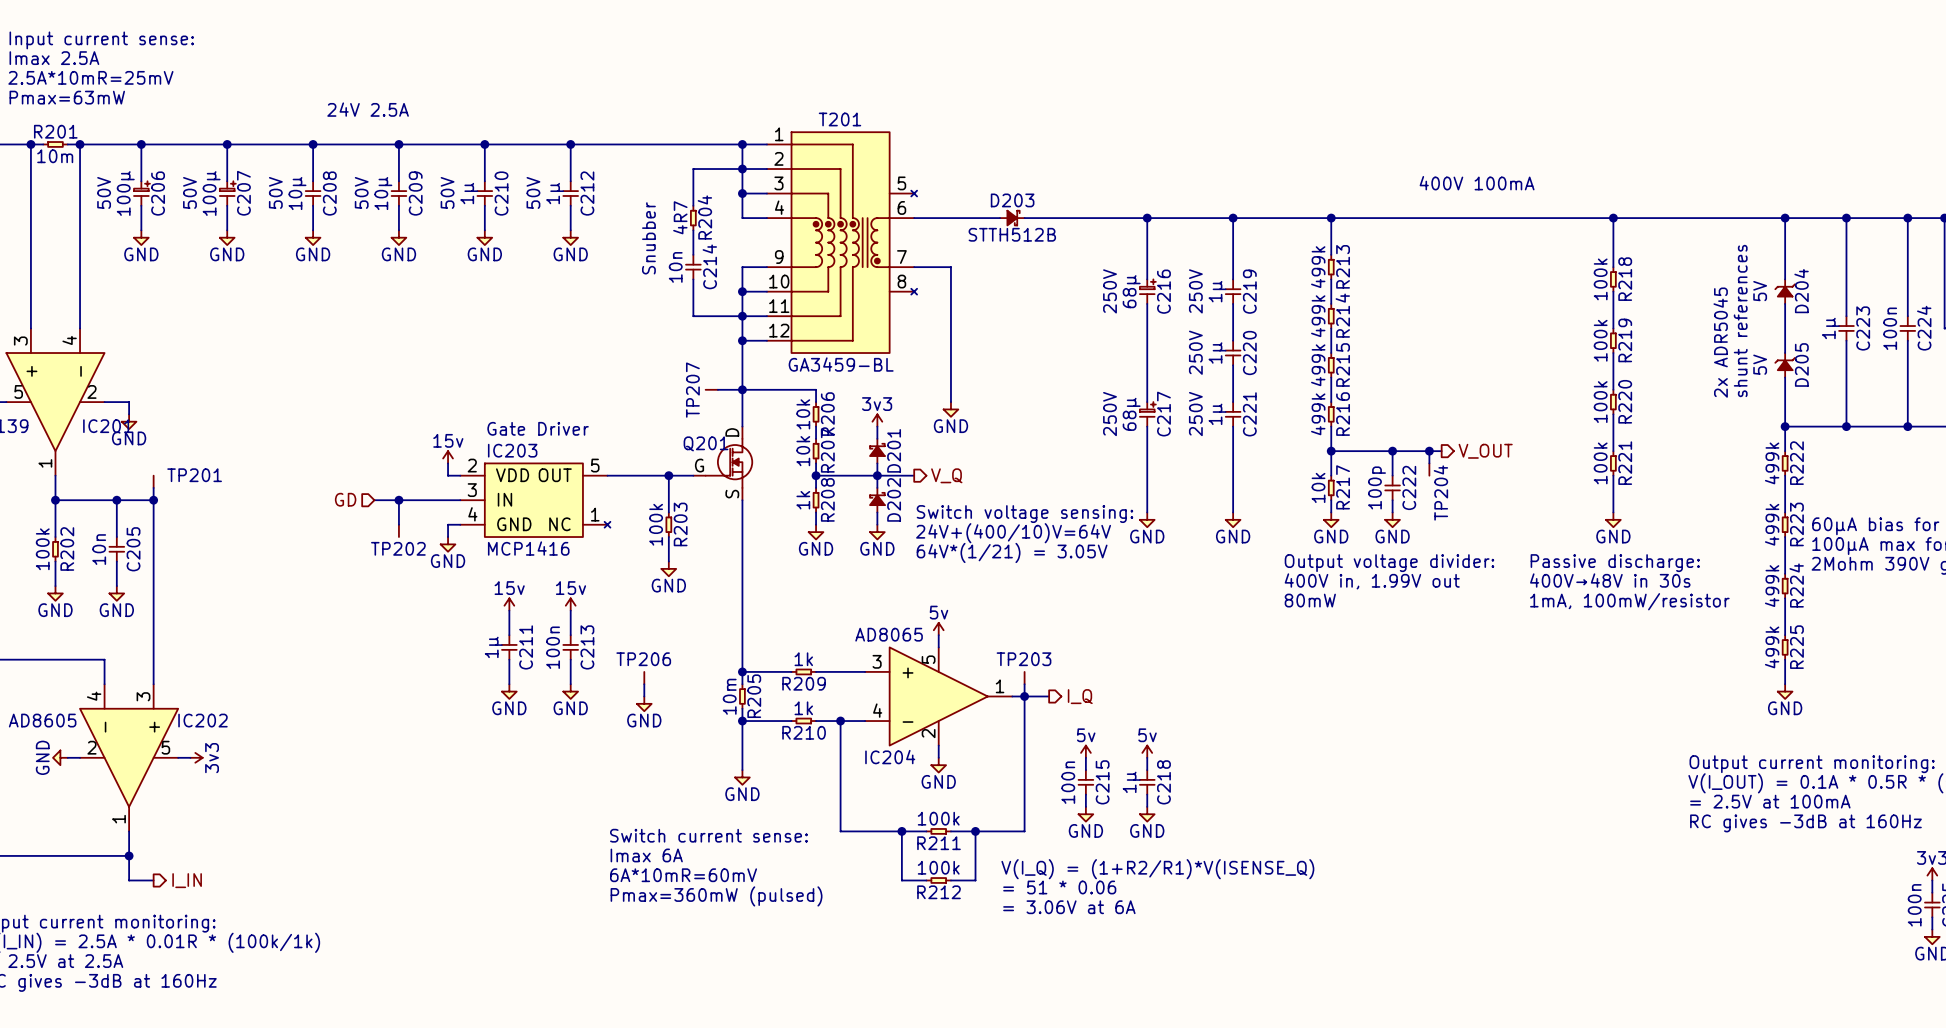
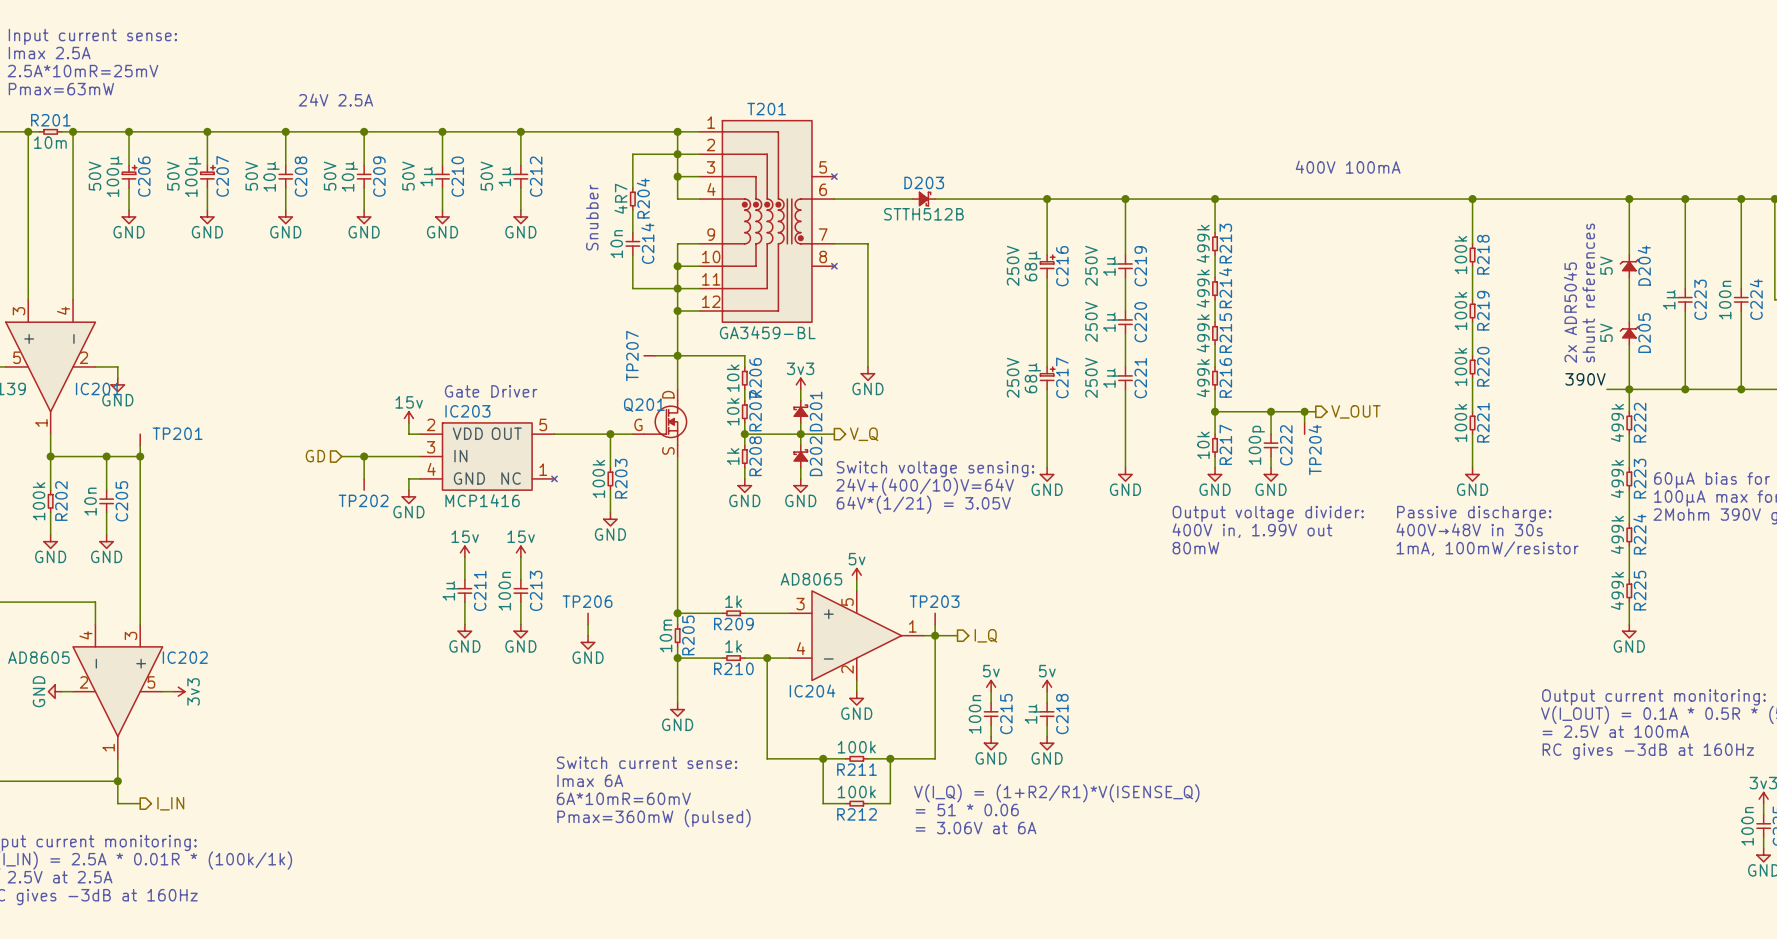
label: none -> 390V (1585, 379)
wire: none -> (1606, 389) (1629, 389)

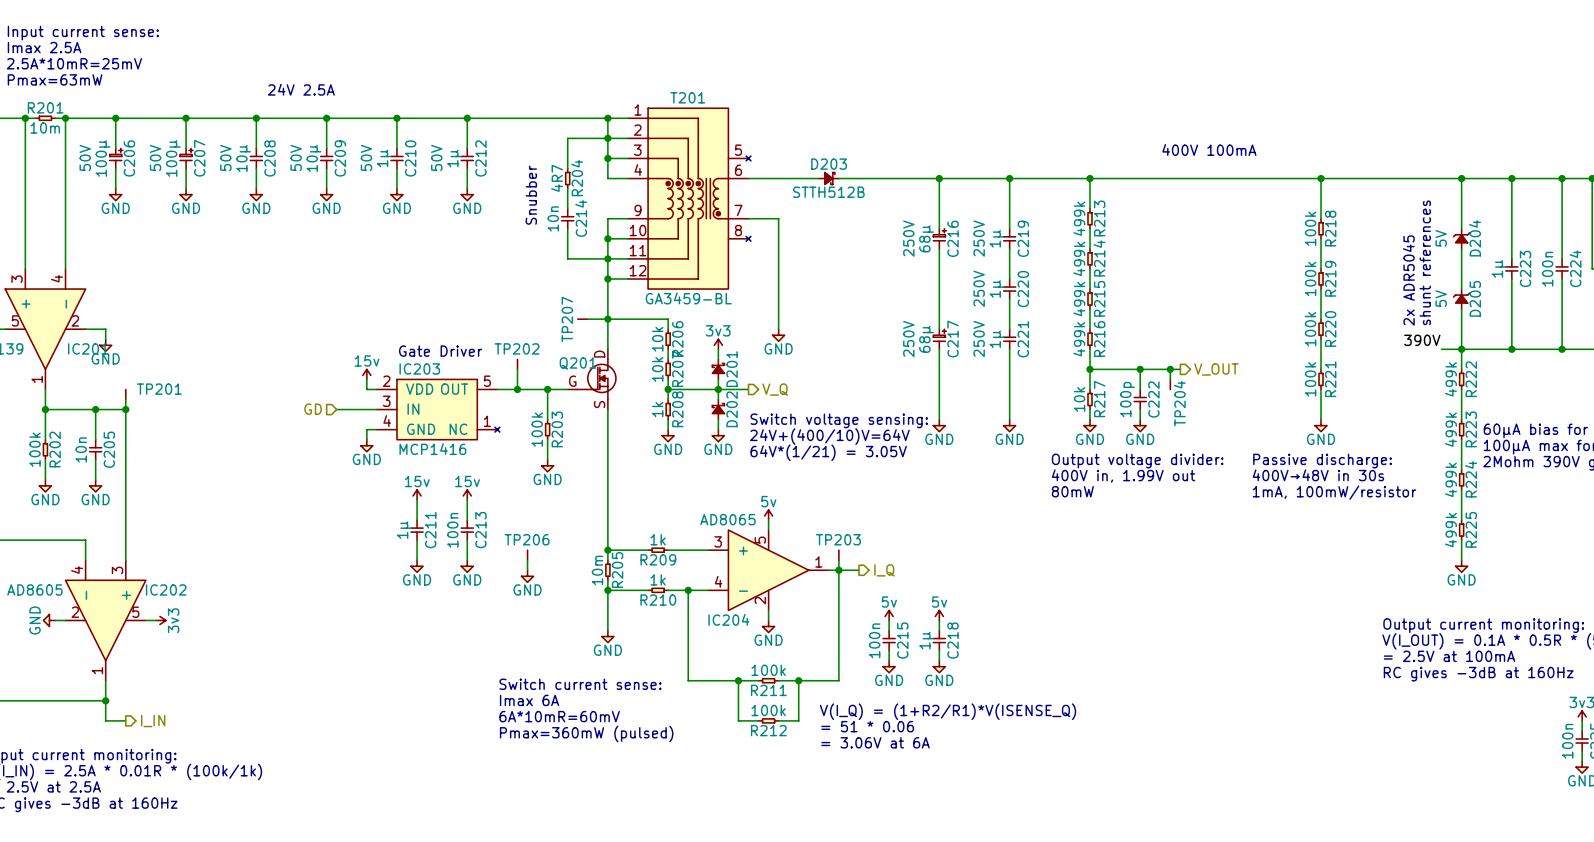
junction: none -> (517, 389)
hierarchical label position: GD (315, 456) -> GD (313, 409)
wire: (341, 456) (375, 456) -> none
wire: (364, 456) (364, 478) -> (517, 369) (517, 389)
junction: (364, 456) -> none
TP202 position: (364, 487) -> (517, 362)
TP202 rotation: 0° (364, 490) -> 180° (517, 359)

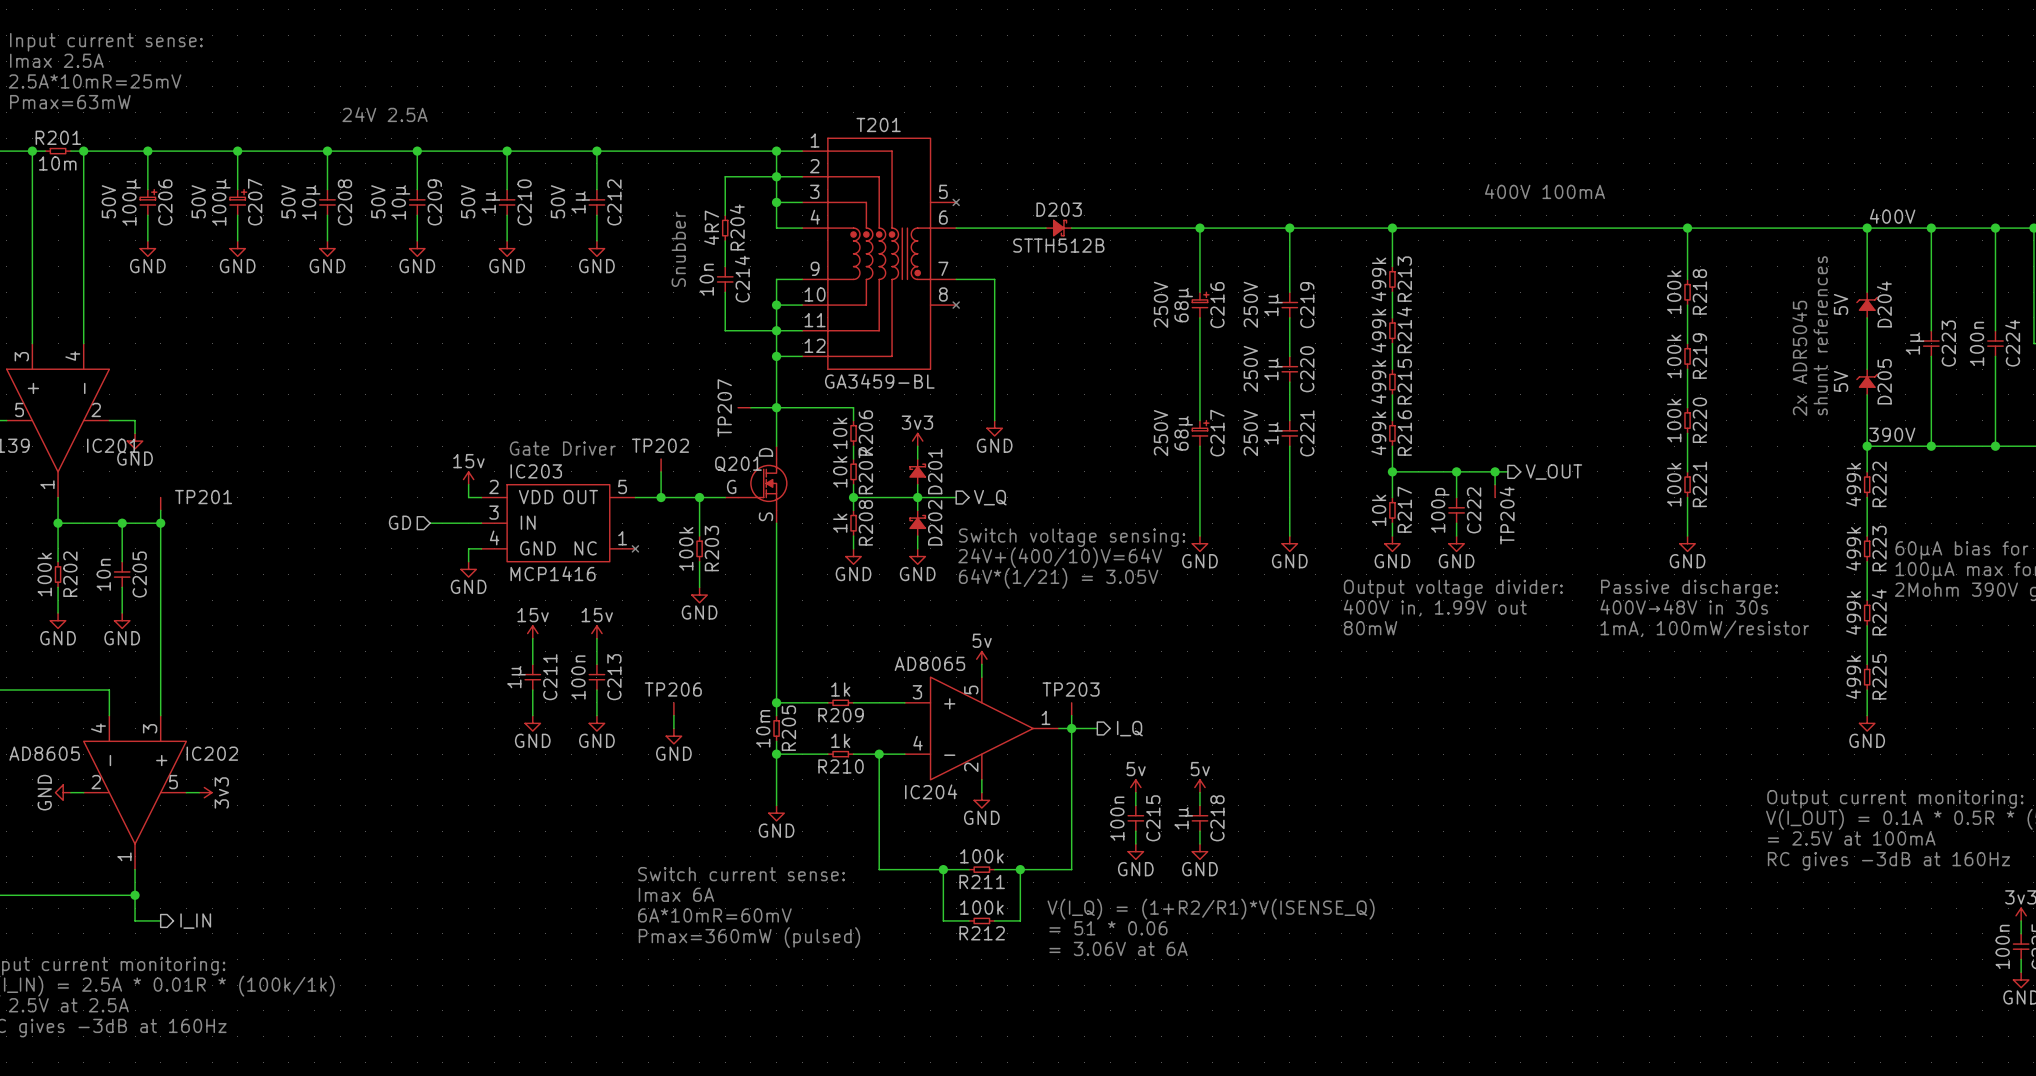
label: none -> 400V (1892, 216)
label position: 390V (1422, 340) -> 390V (1892, 434)
wire: (1441, 349) (1461, 349) -> none

